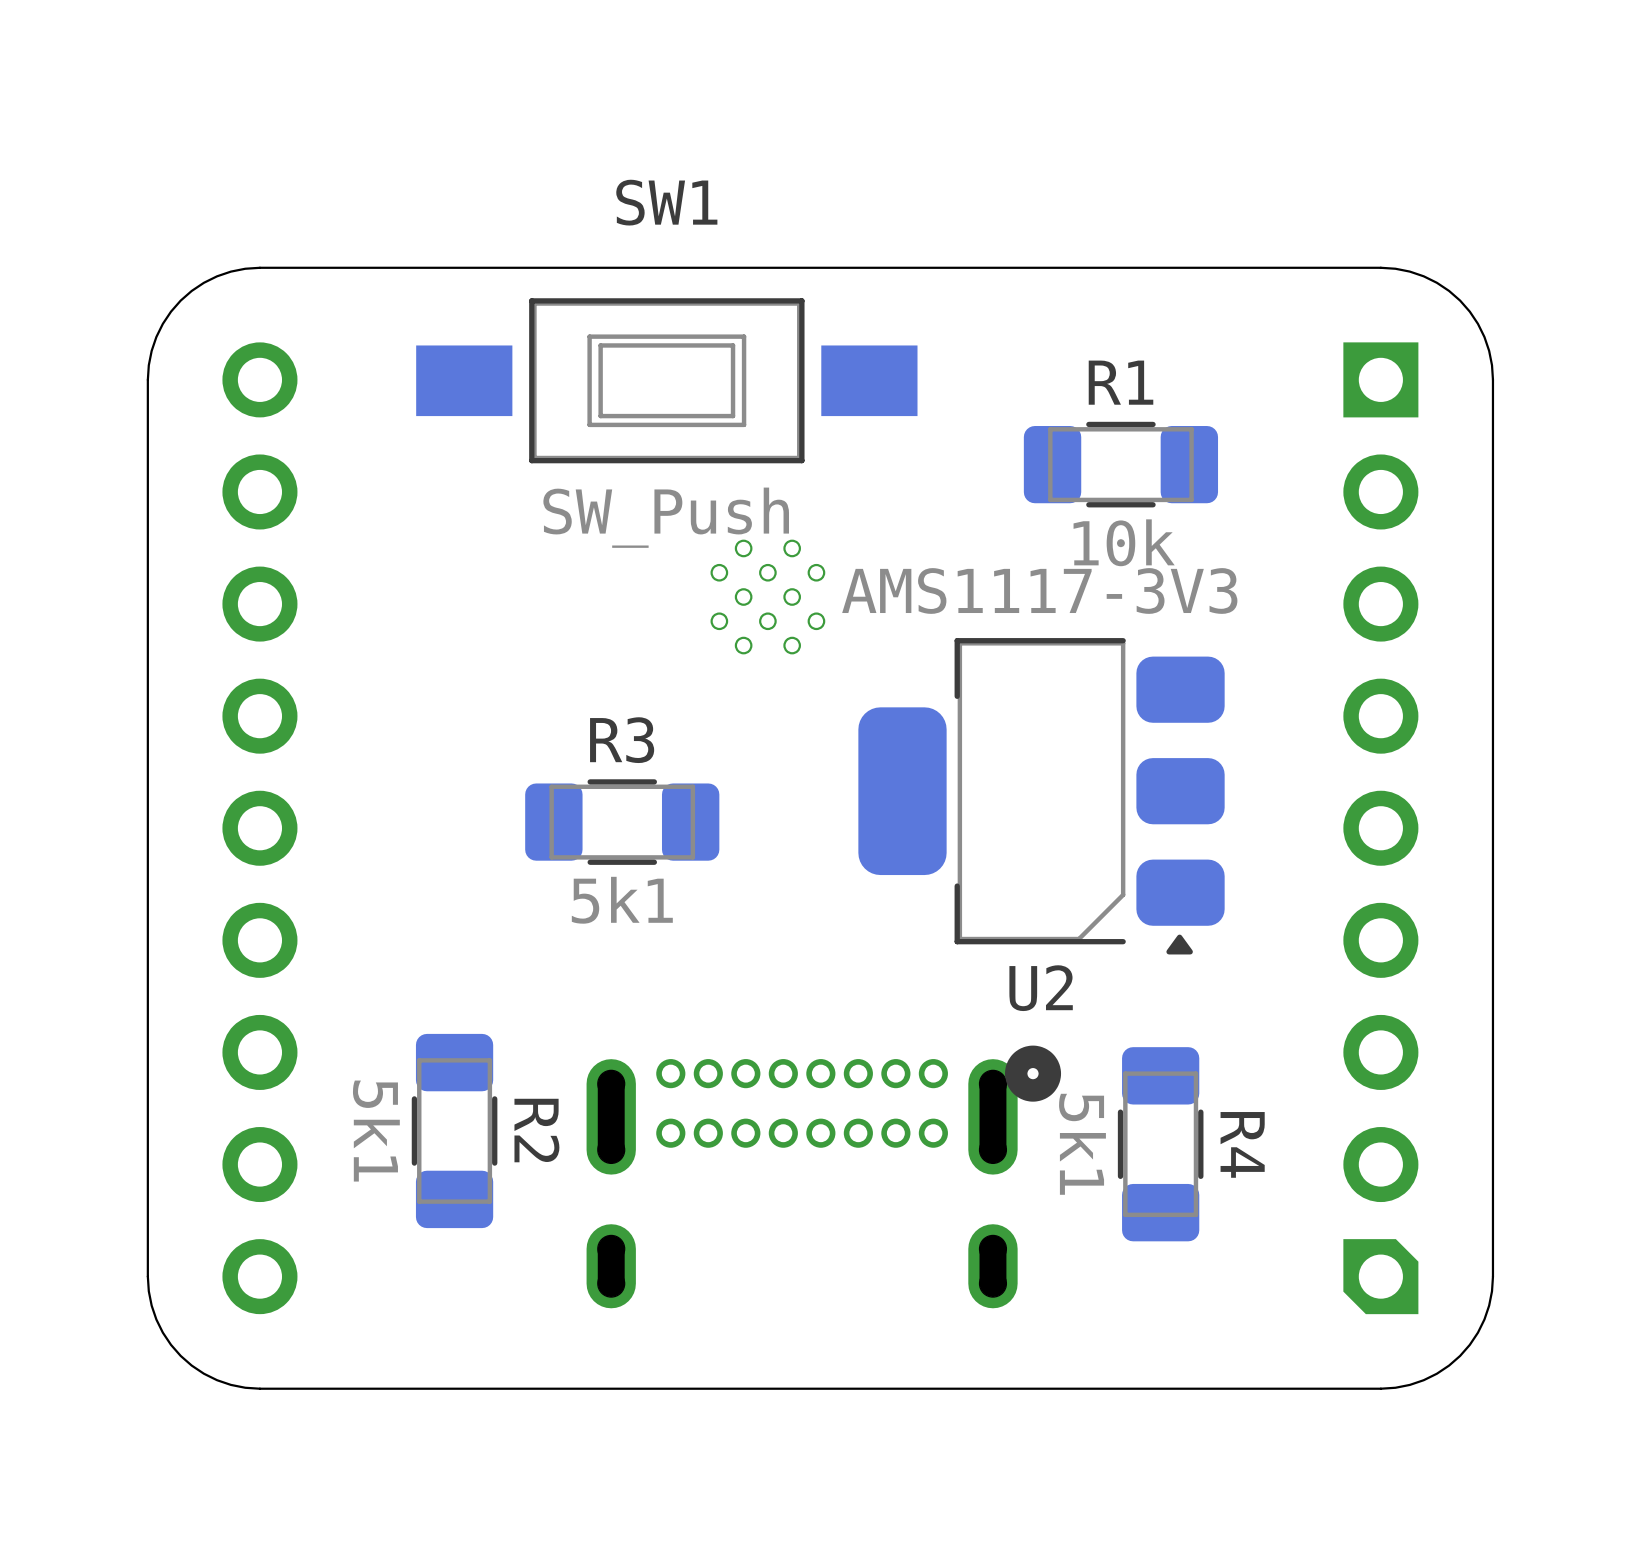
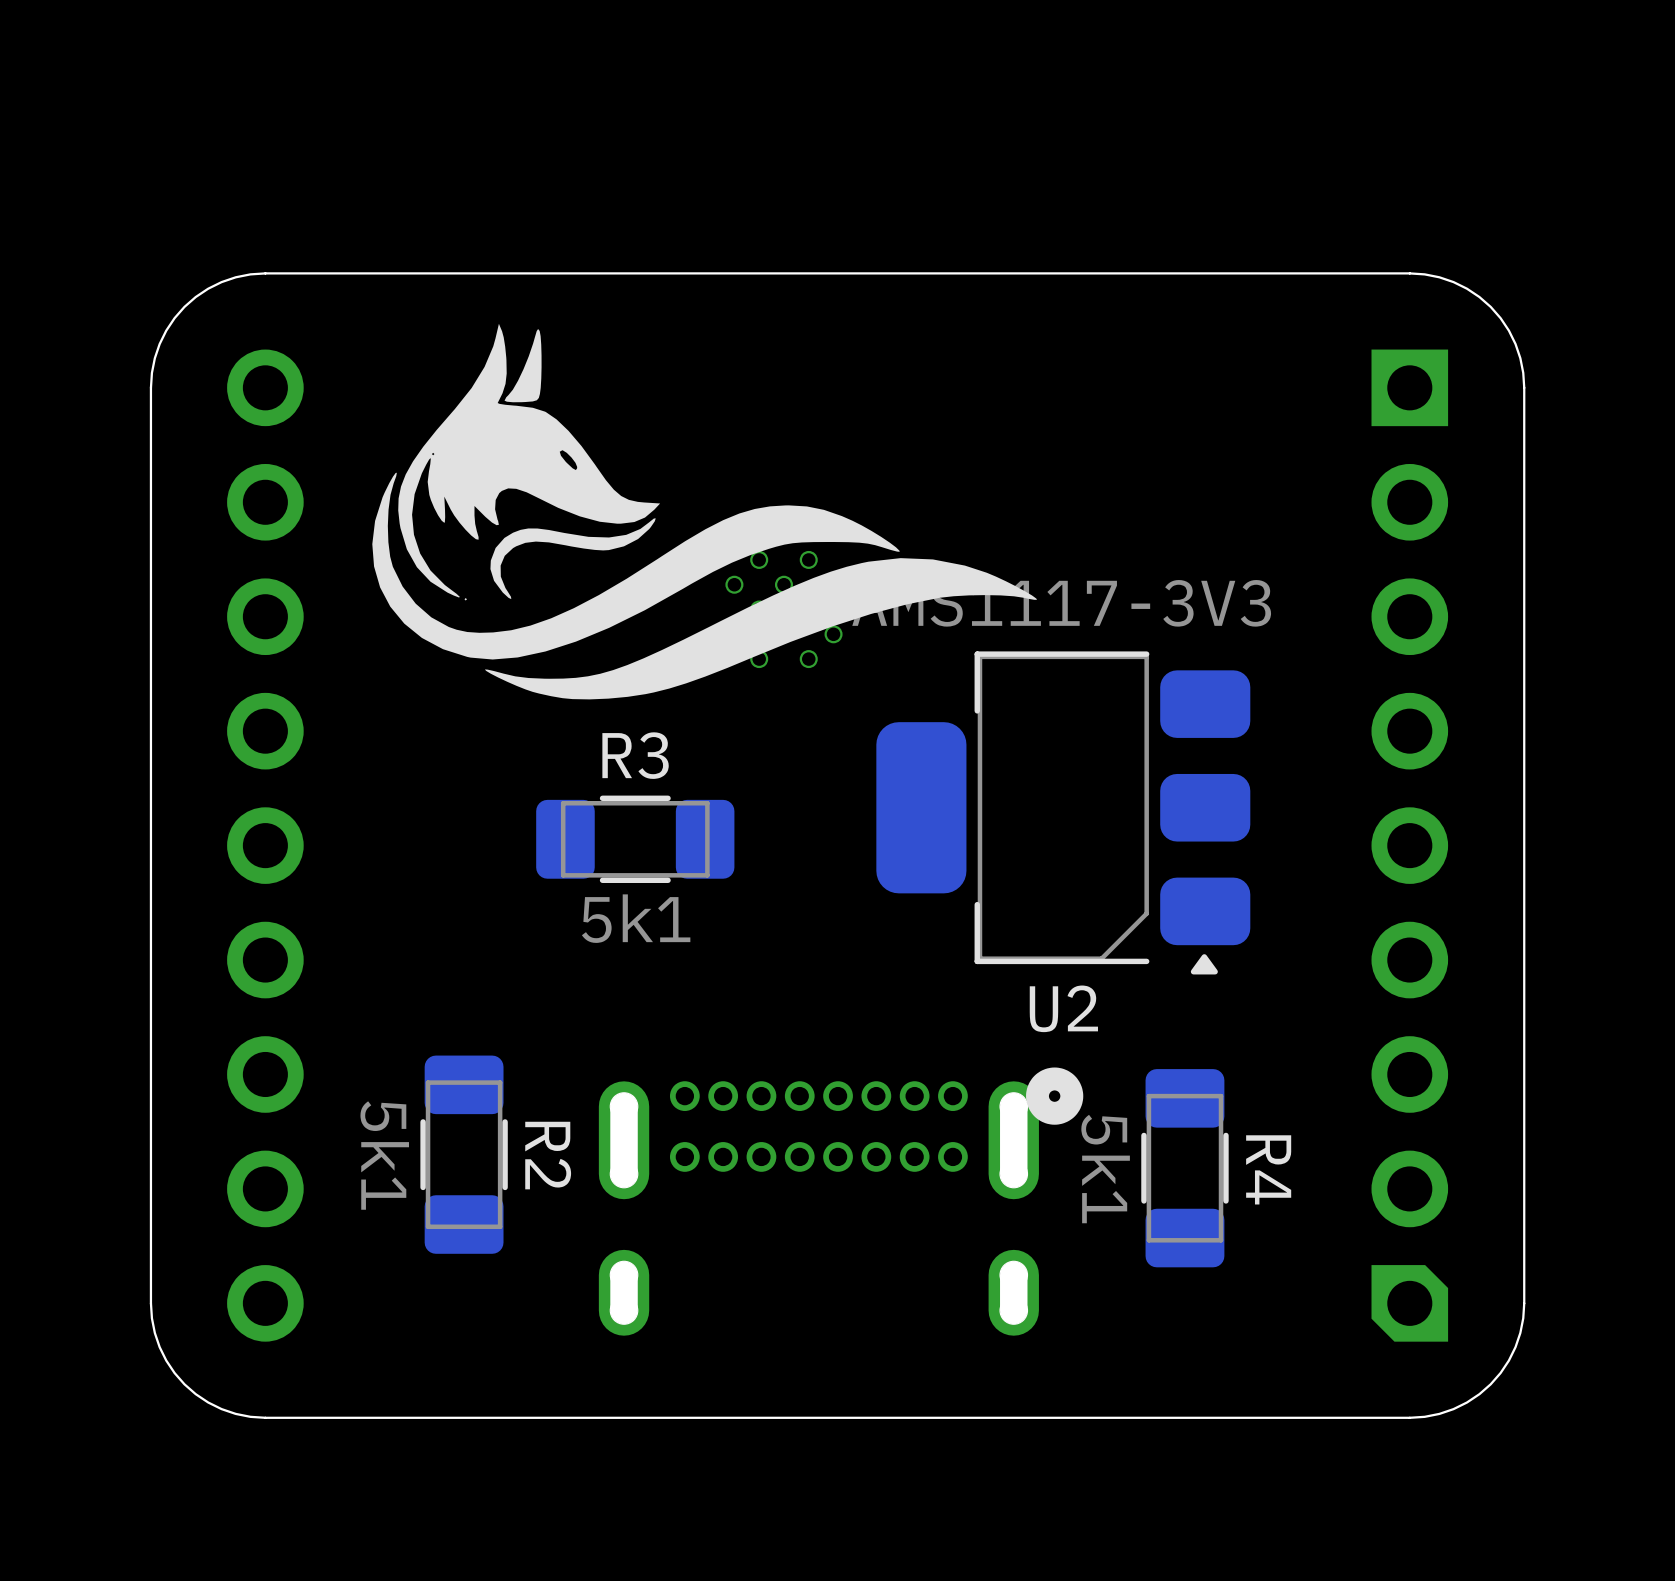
drawing: none -> [372, 323, 1037, 700]
SW1: SW_Push (666, 380) -> none
R1: 10k (1120, 464) -> none

